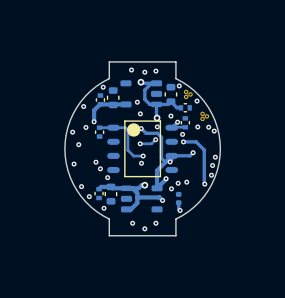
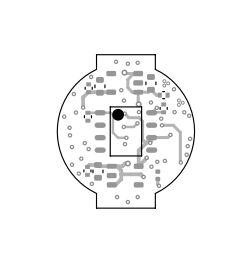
via: (179, 85) -> none
via: none -> (69, 135)
via: (74, 164) -> none
via: none -> (71, 147)
via: (107, 177) -> none
via: none -> (81, 158)

